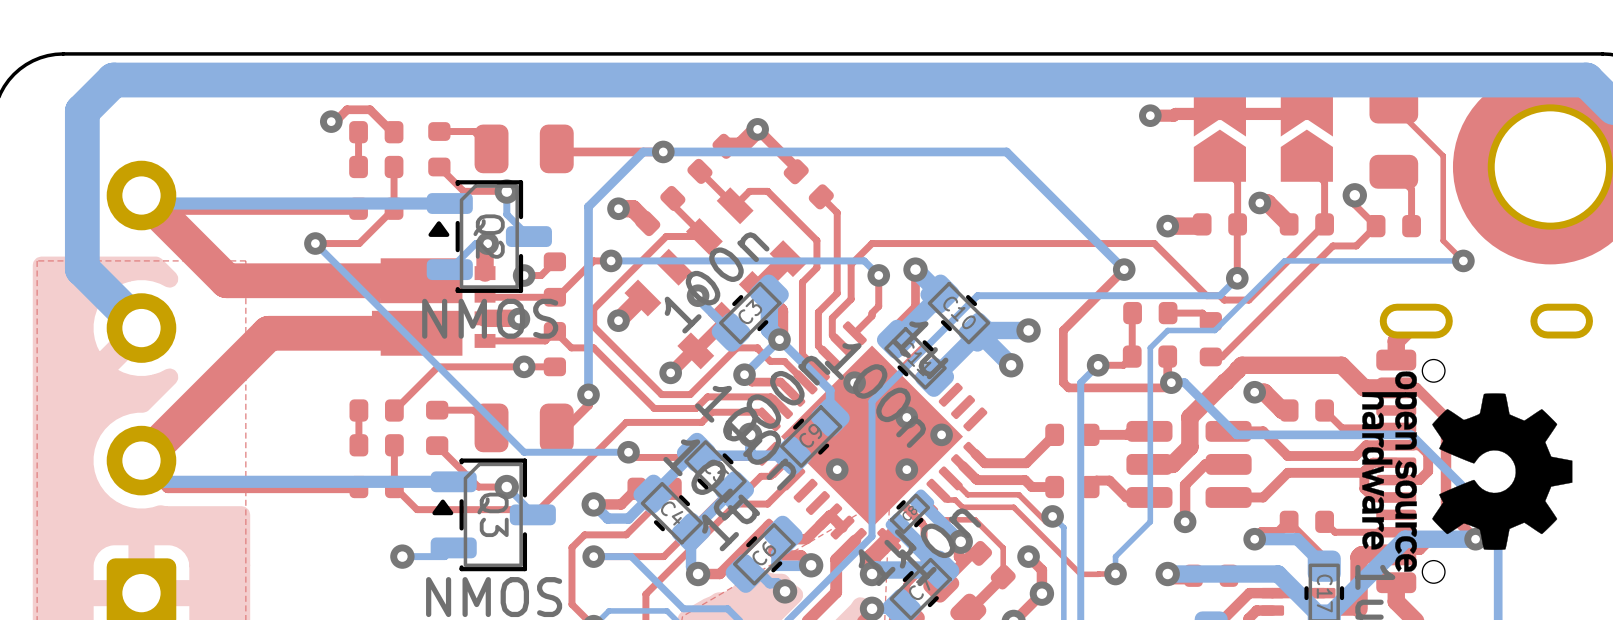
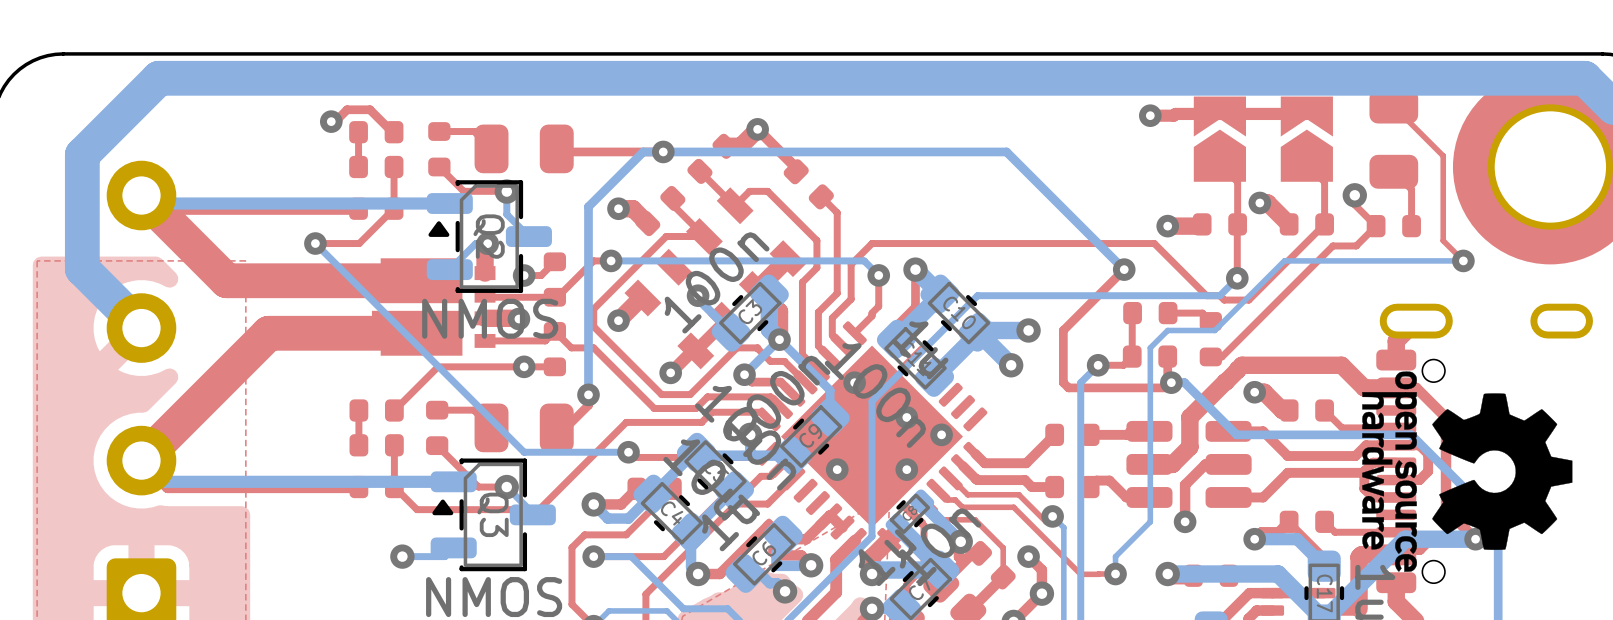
bottom track: (1586, 80) (113, 80) (82, 111) (82, 154) -> (1586, 80) (1584, 78) (158, 78) (82, 154)

